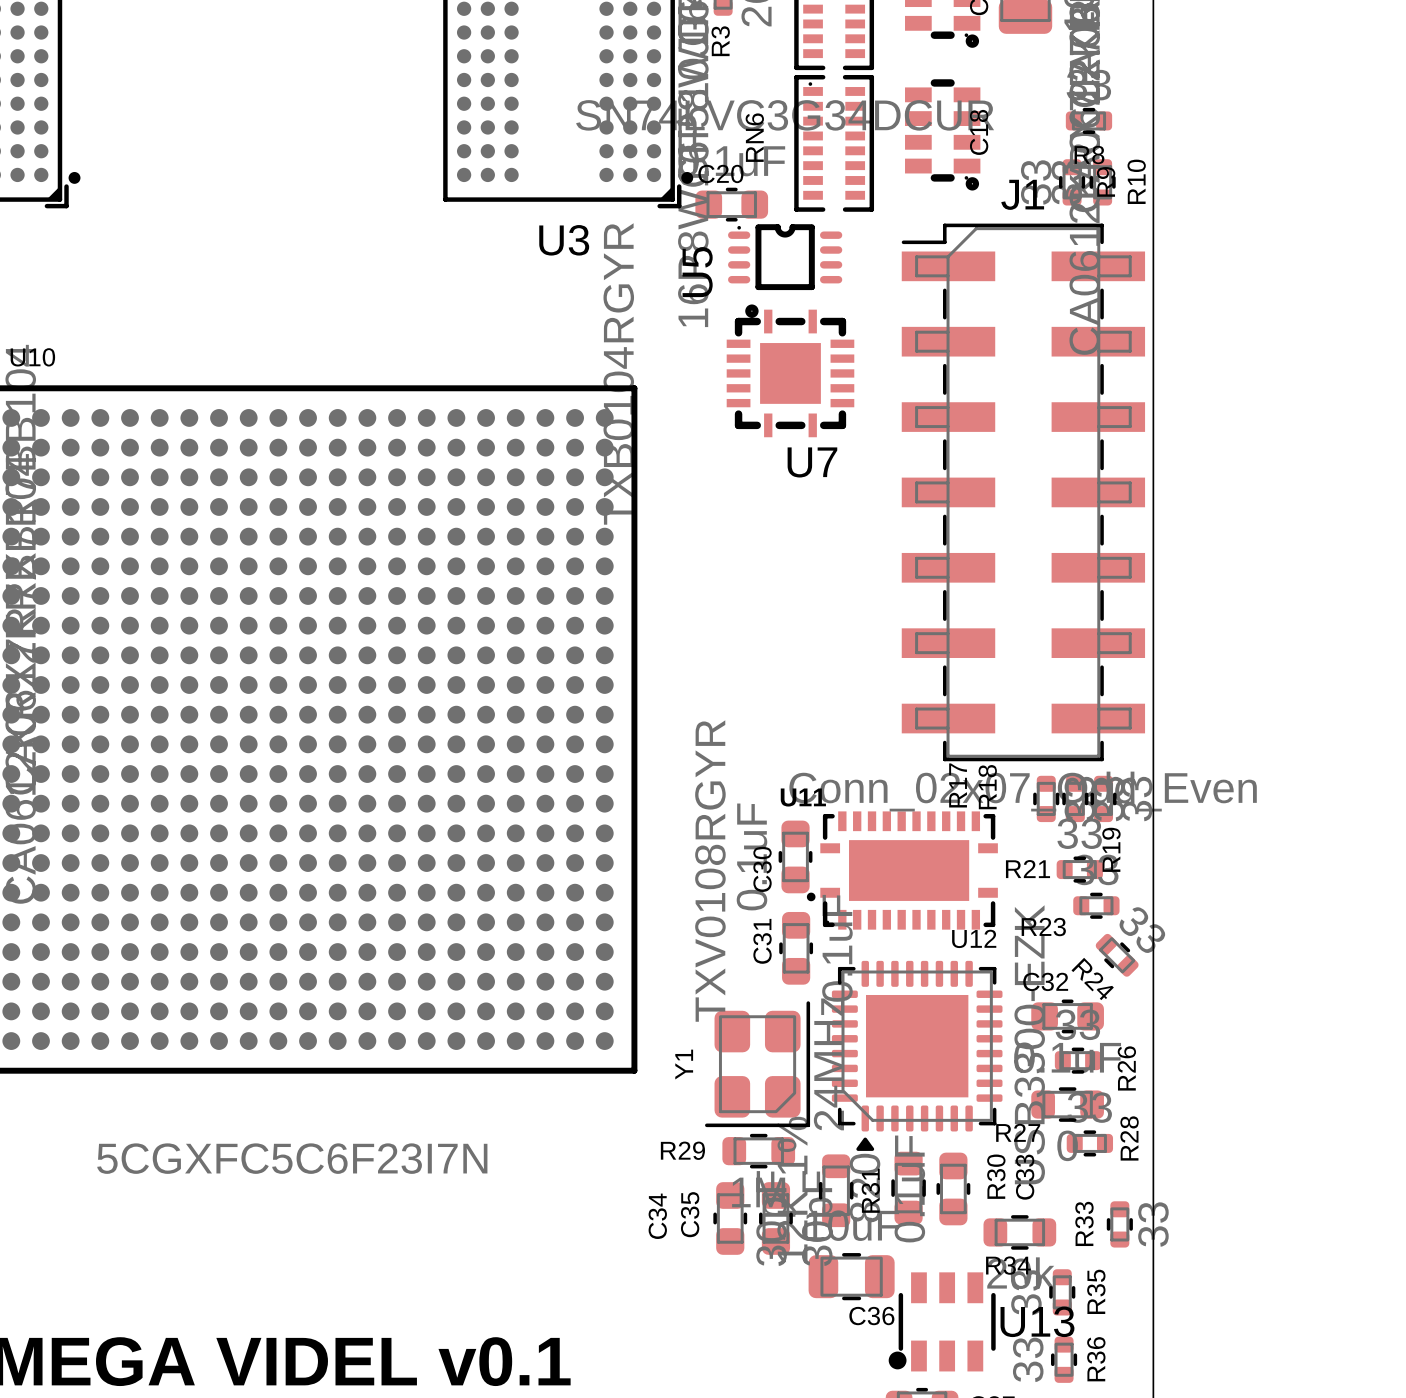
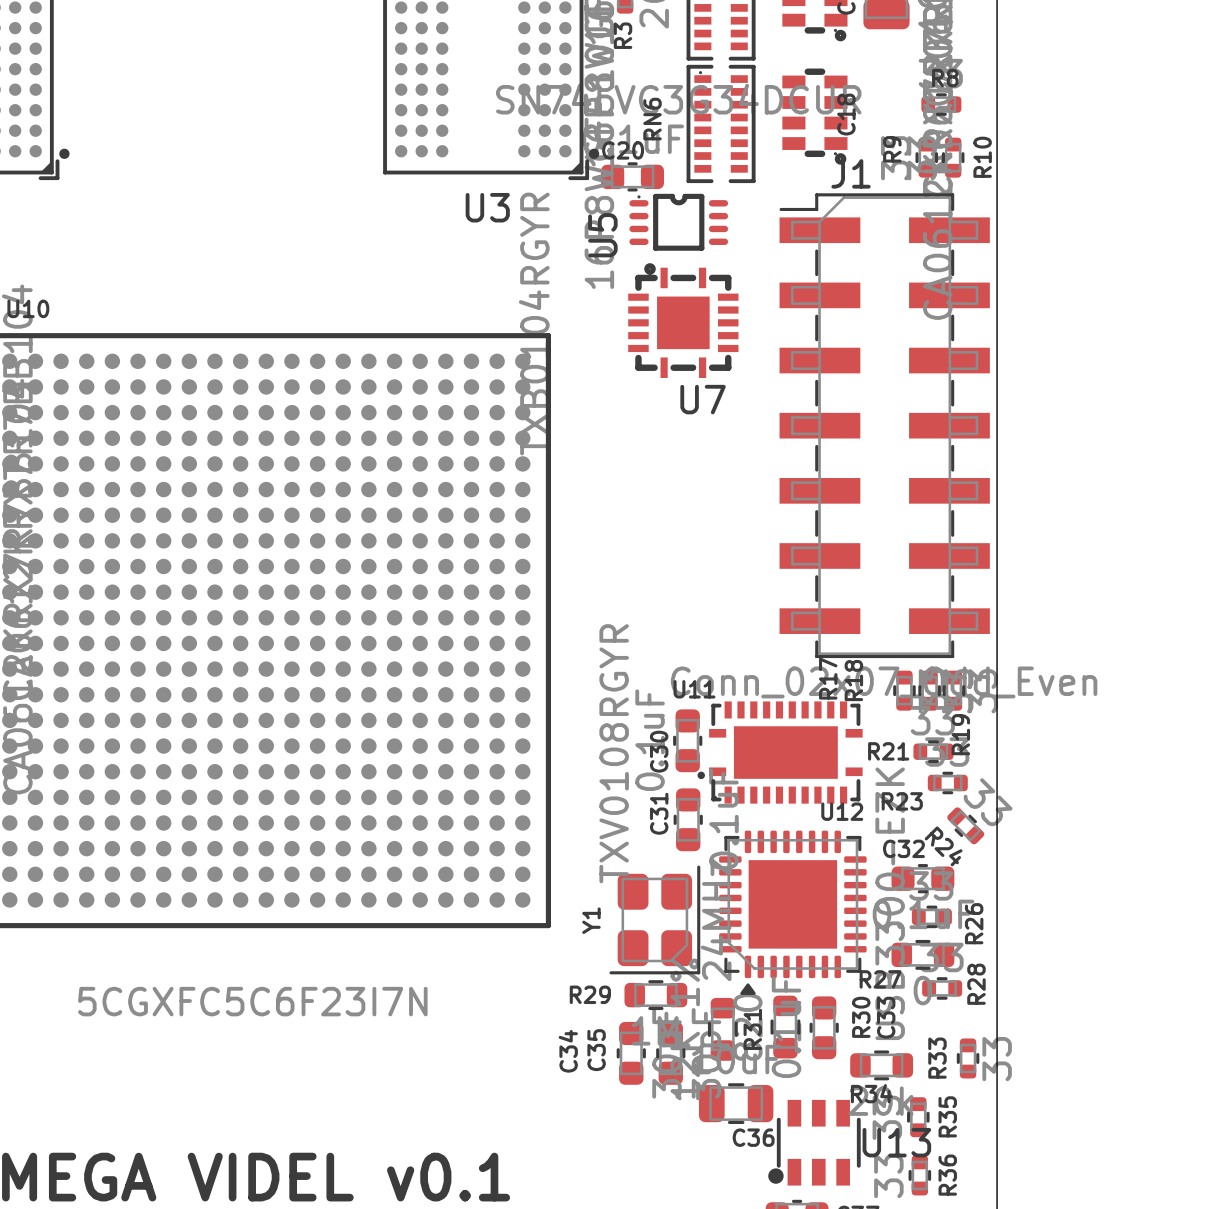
R8 name position: R8 (1089, 154) -> R8 (945, 78)
R9 name position: R9 (1106, 181) -> R9 (892, 149)
J1 name position: J1 (1022, 194) -> J1 (851, 173)

